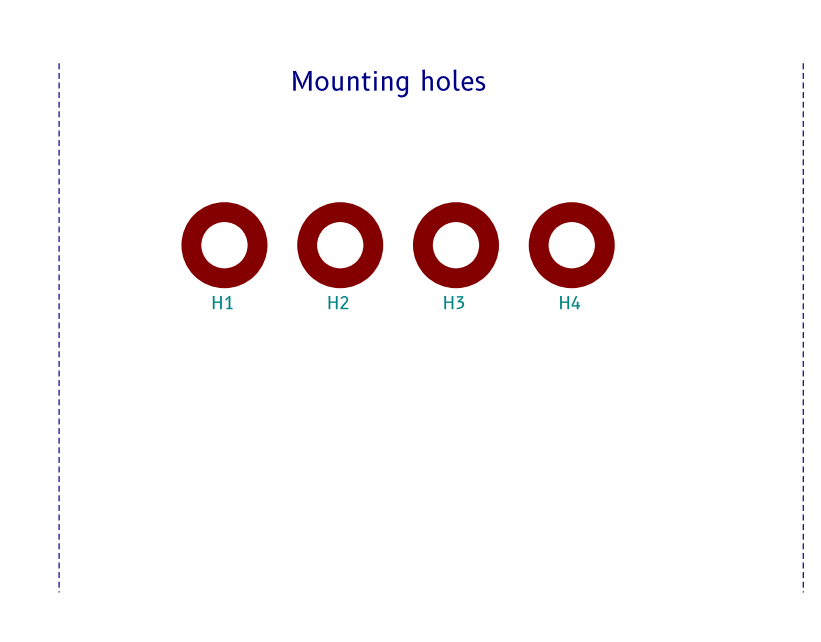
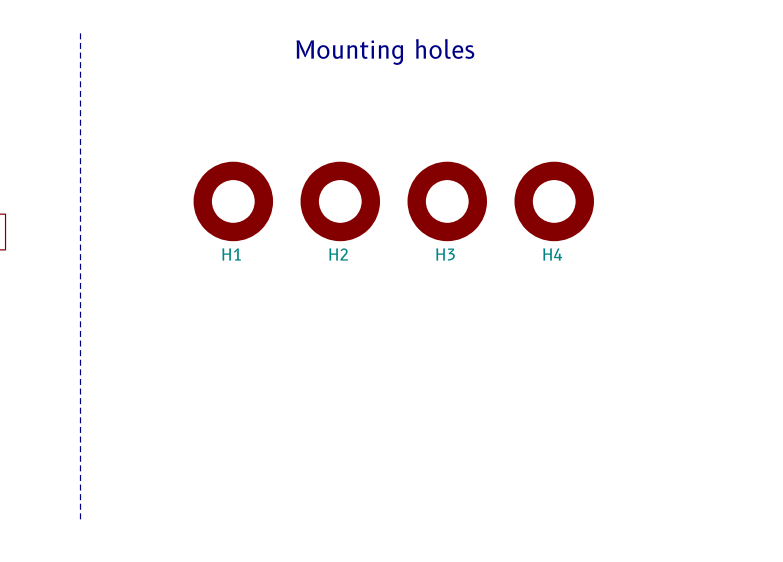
line: (803, 63) (803, 592) -> none

